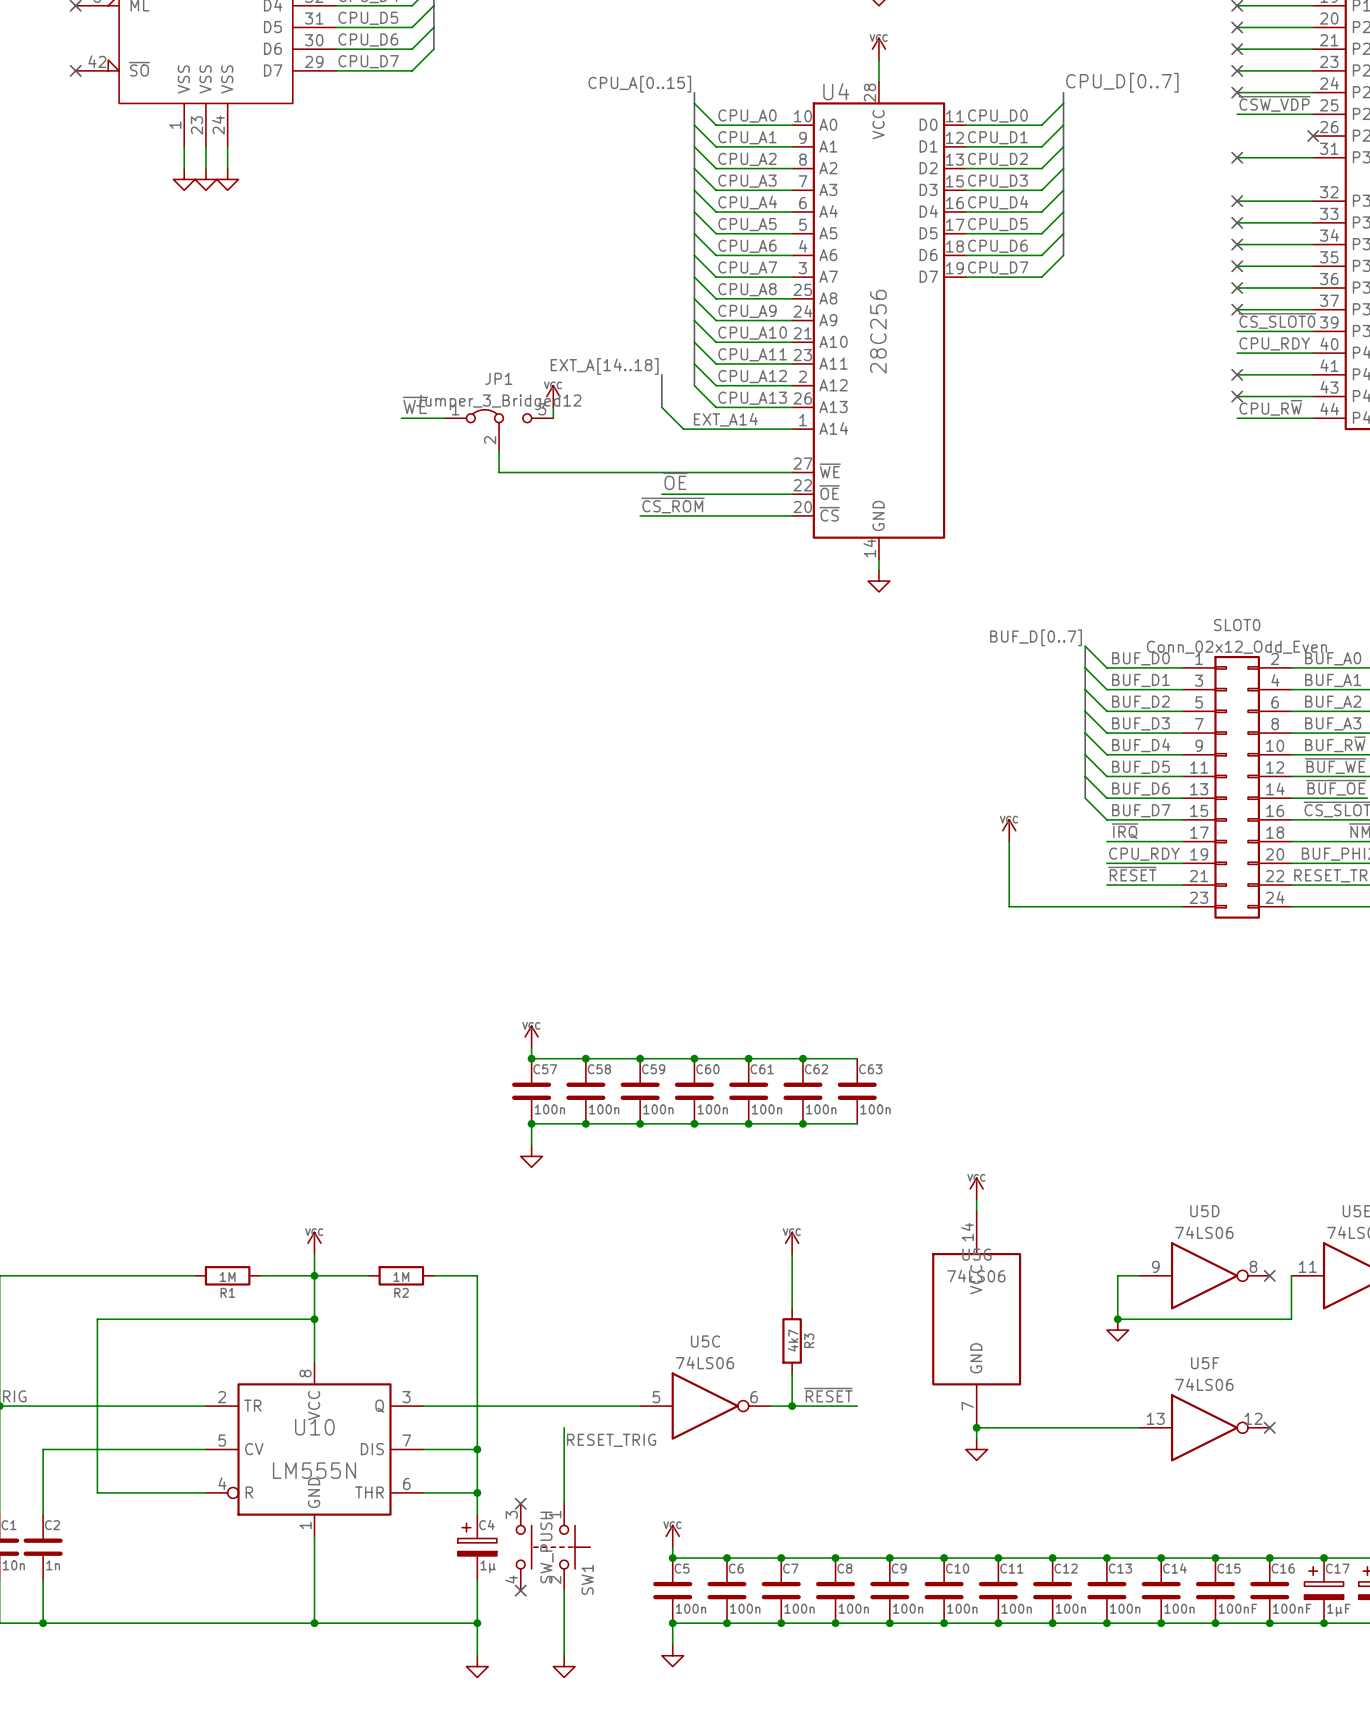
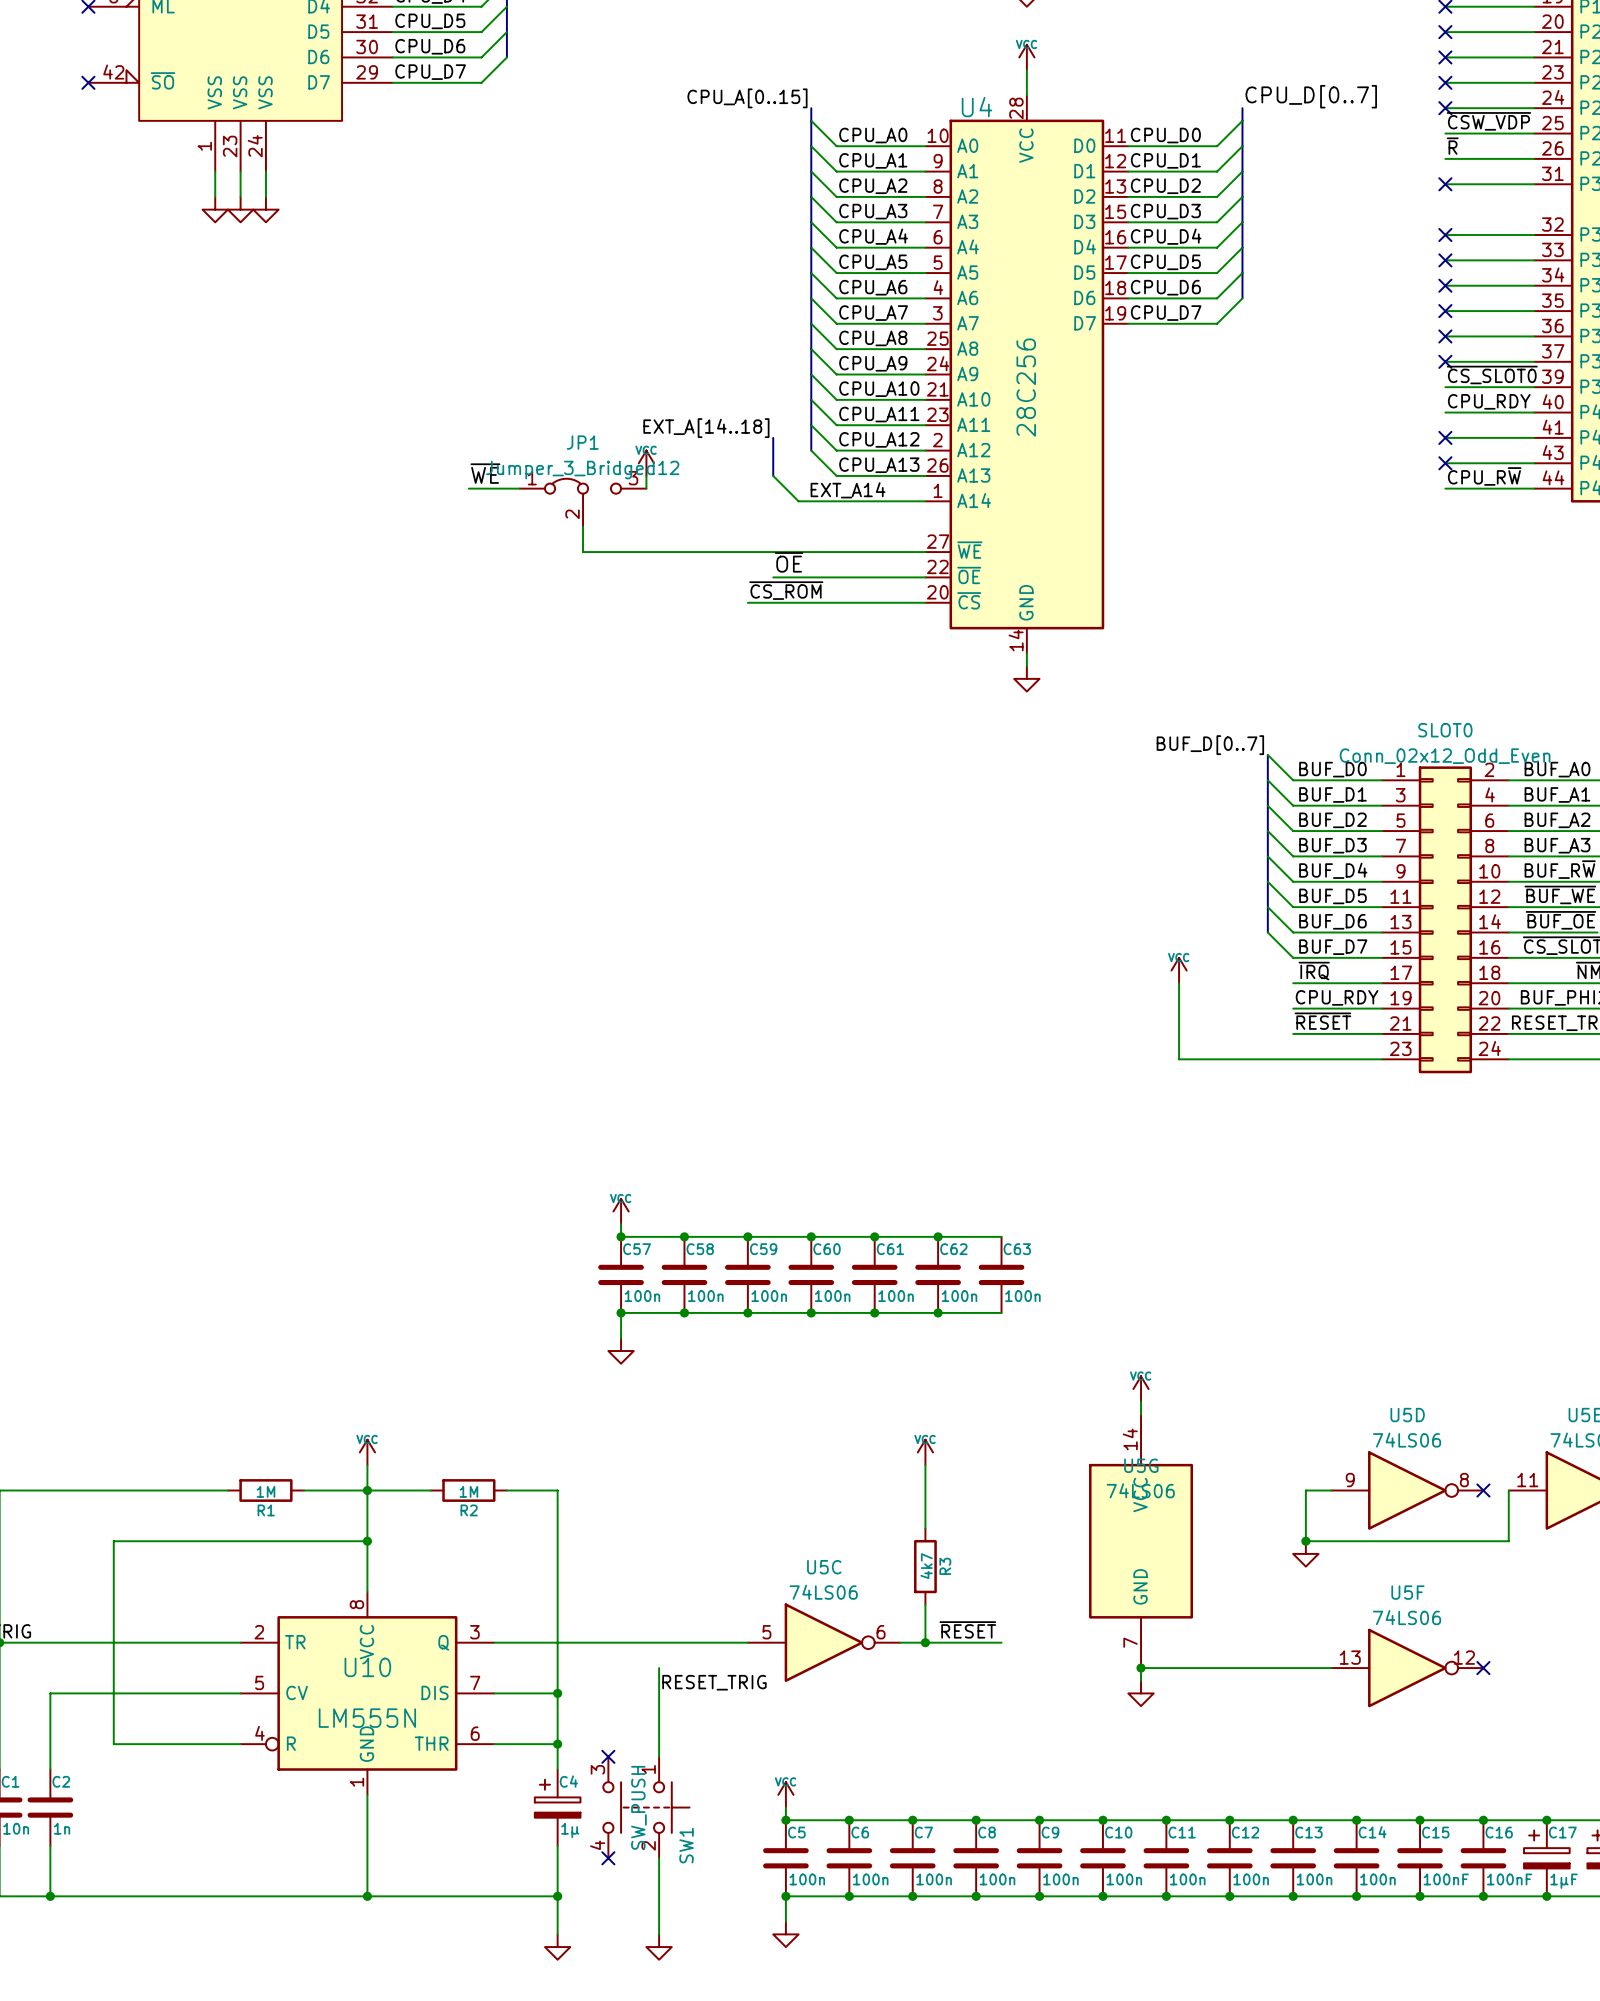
label: none -> ~{R} (1452, 146)
wire: none -> (1445, 158) (1534, 158)
no-connect mark: (1313, 136) -> none

